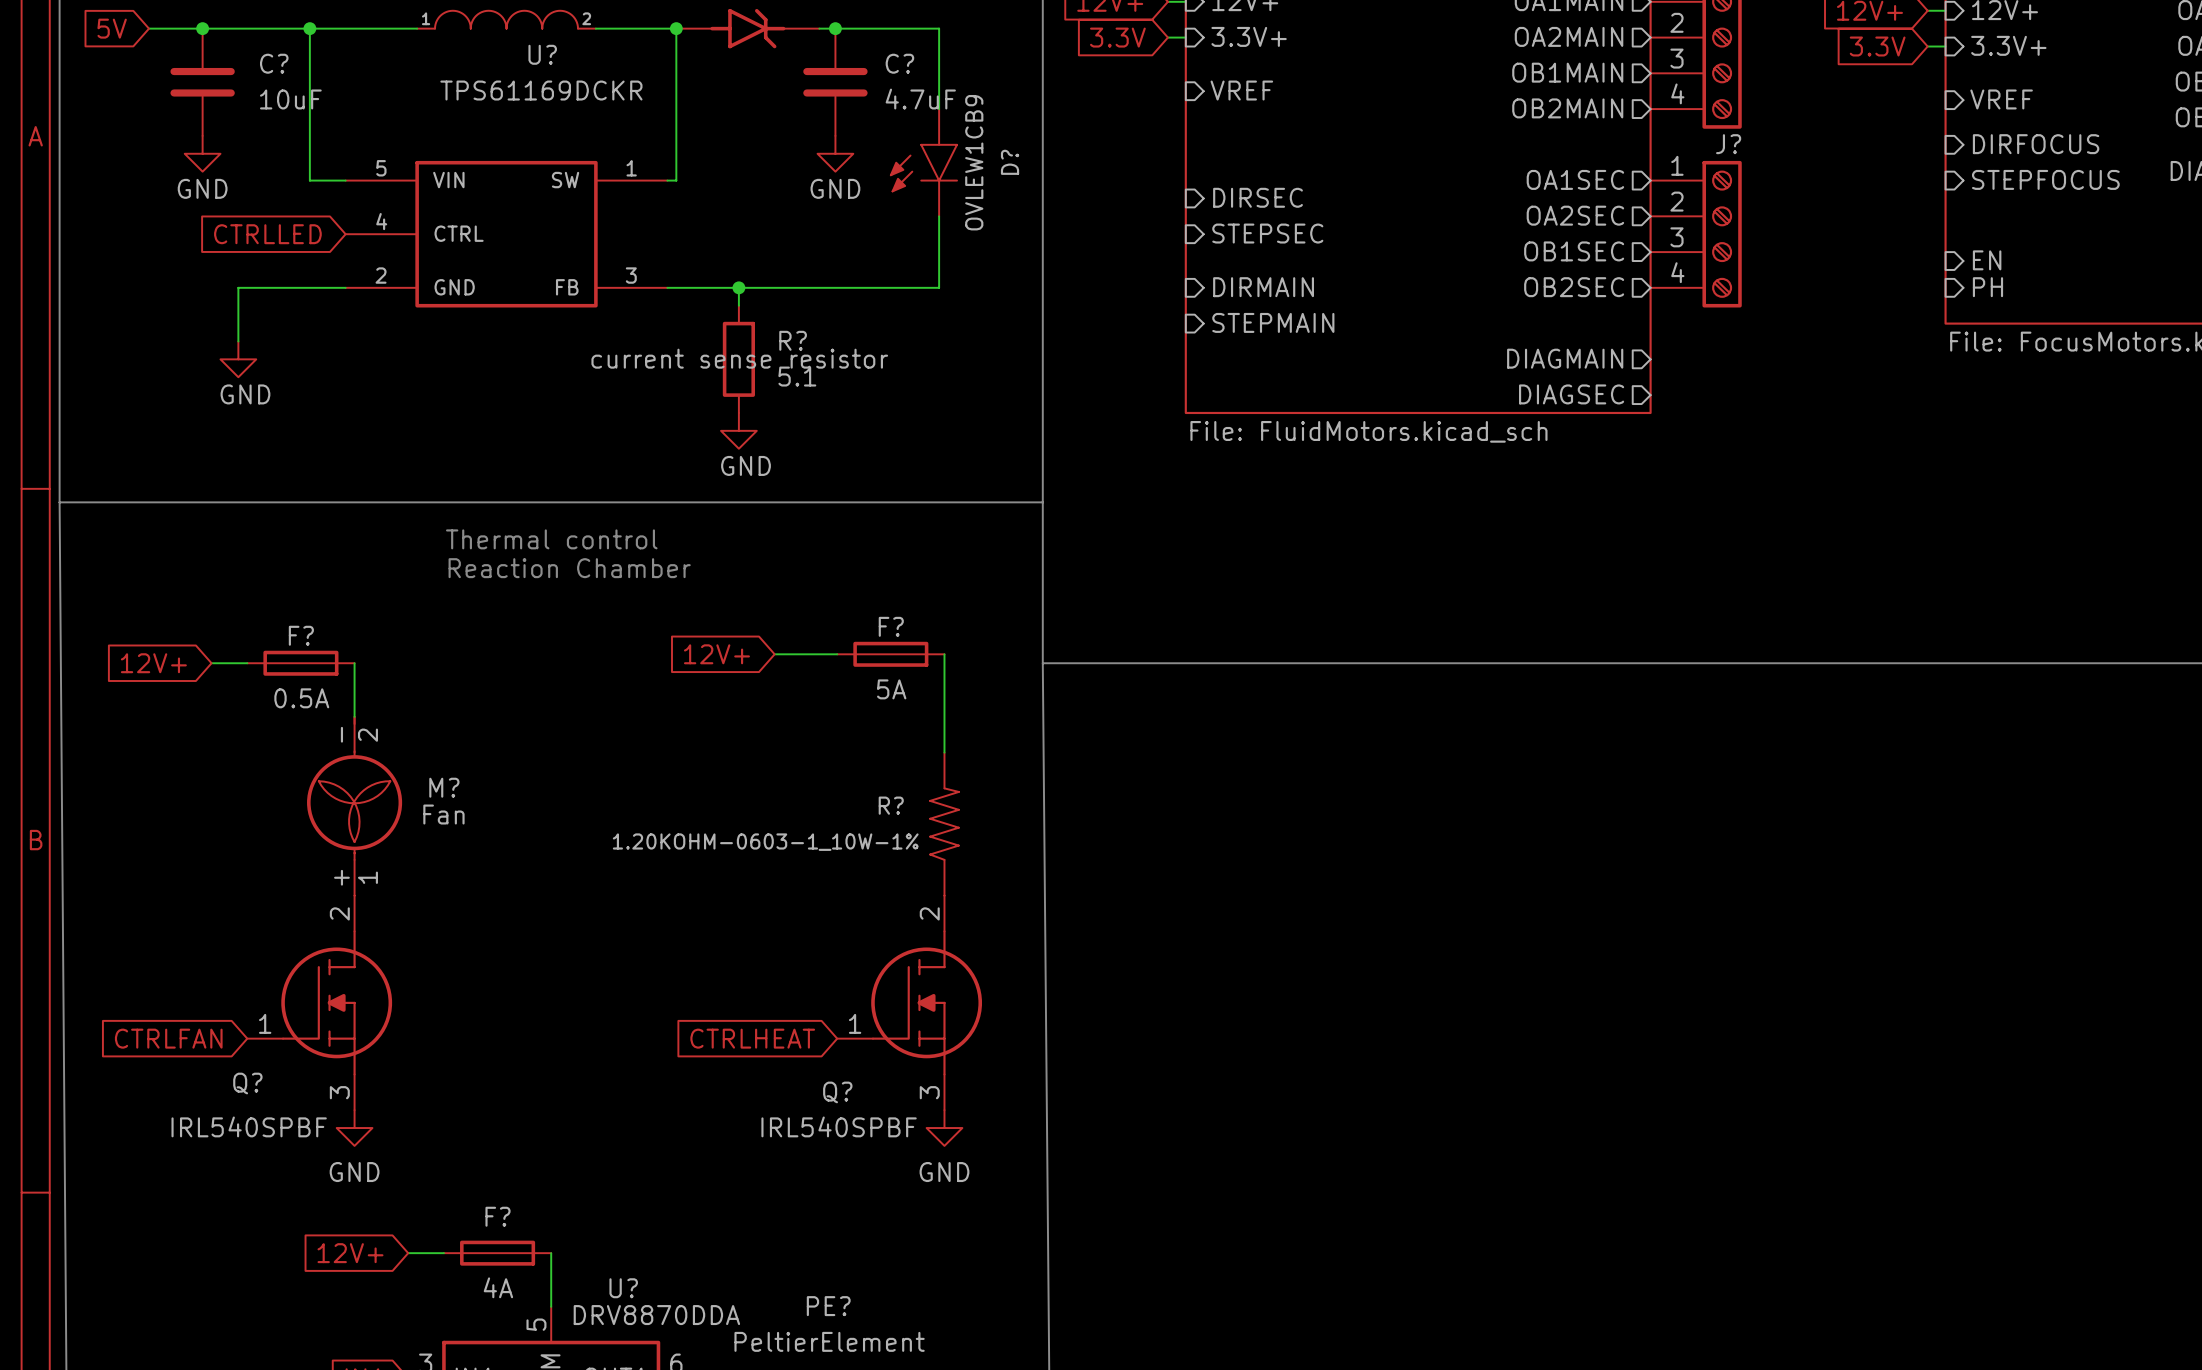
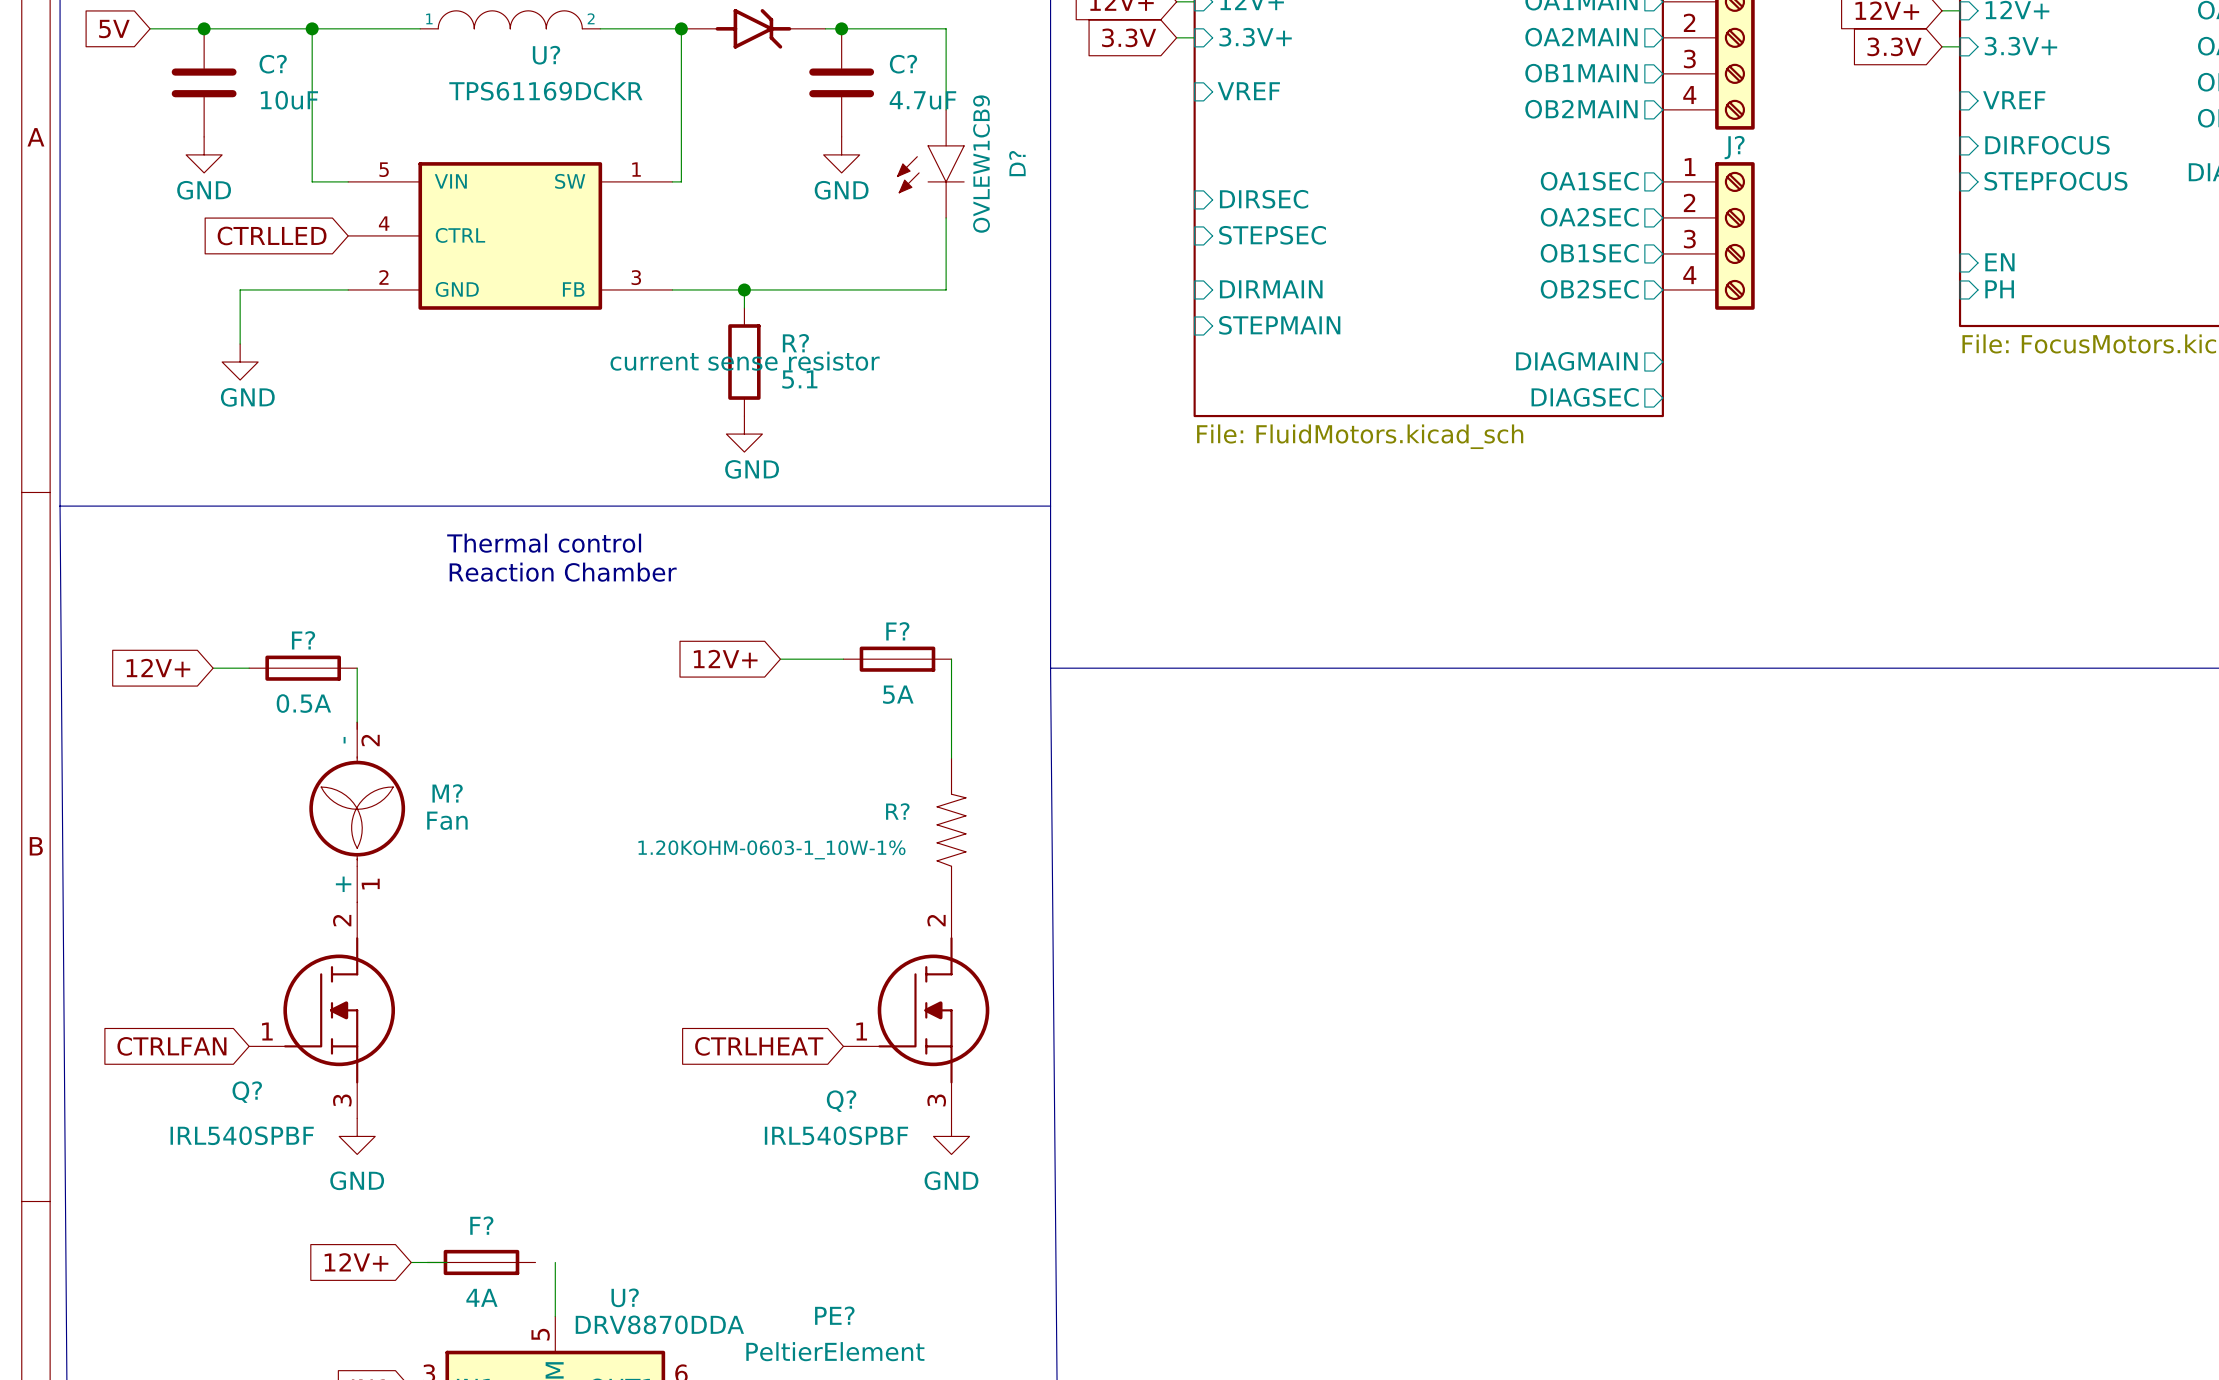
F? position: (497, 1253) -> (481, 1262)

